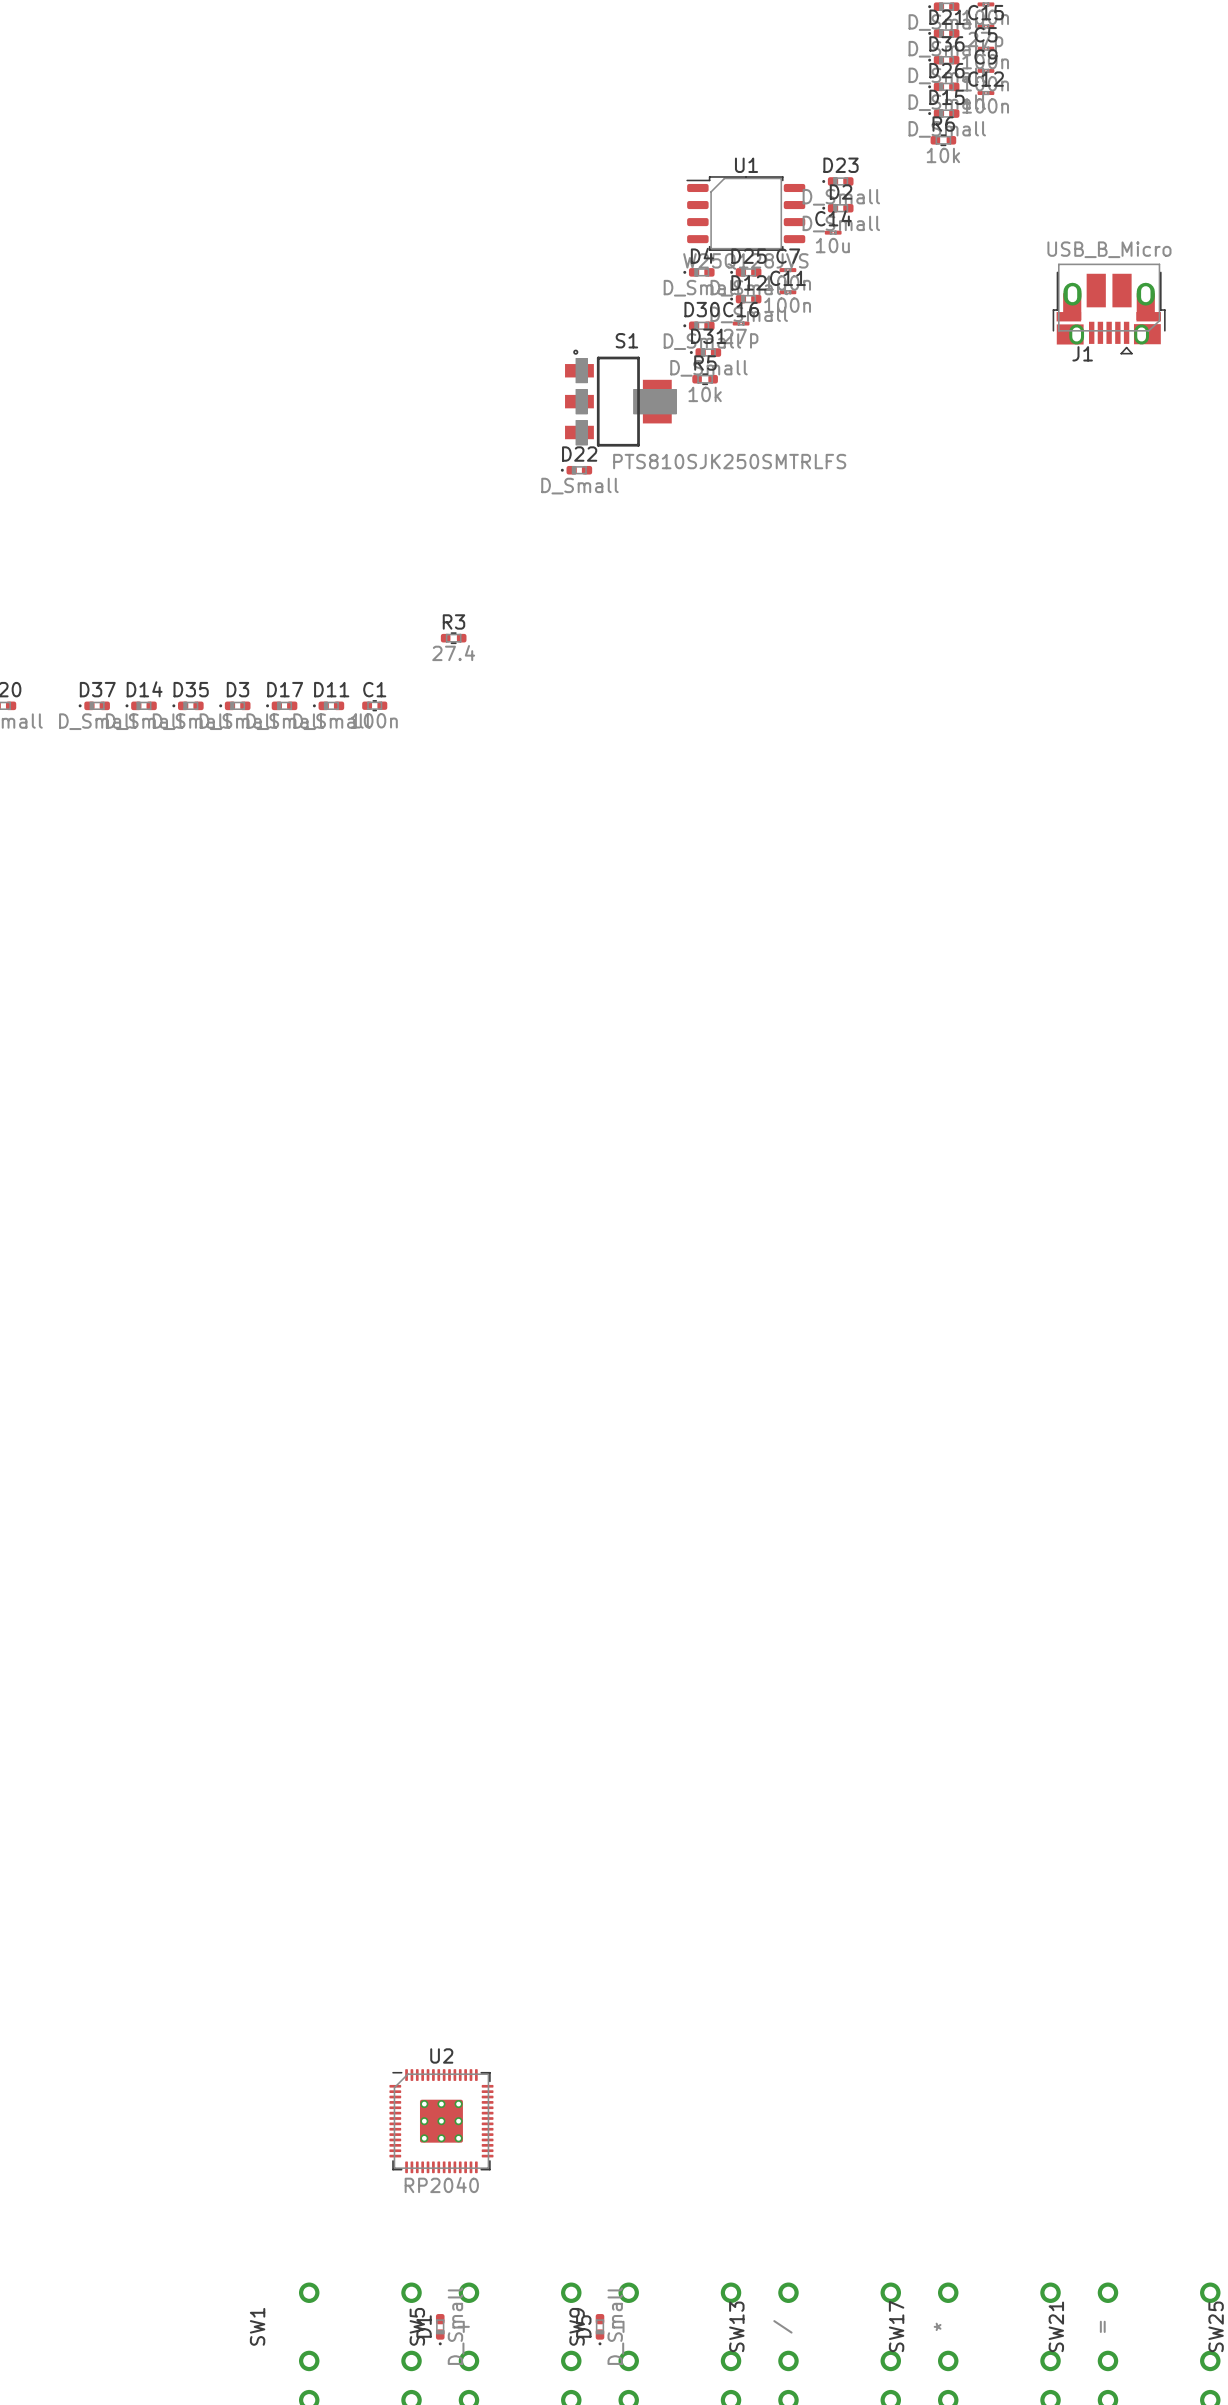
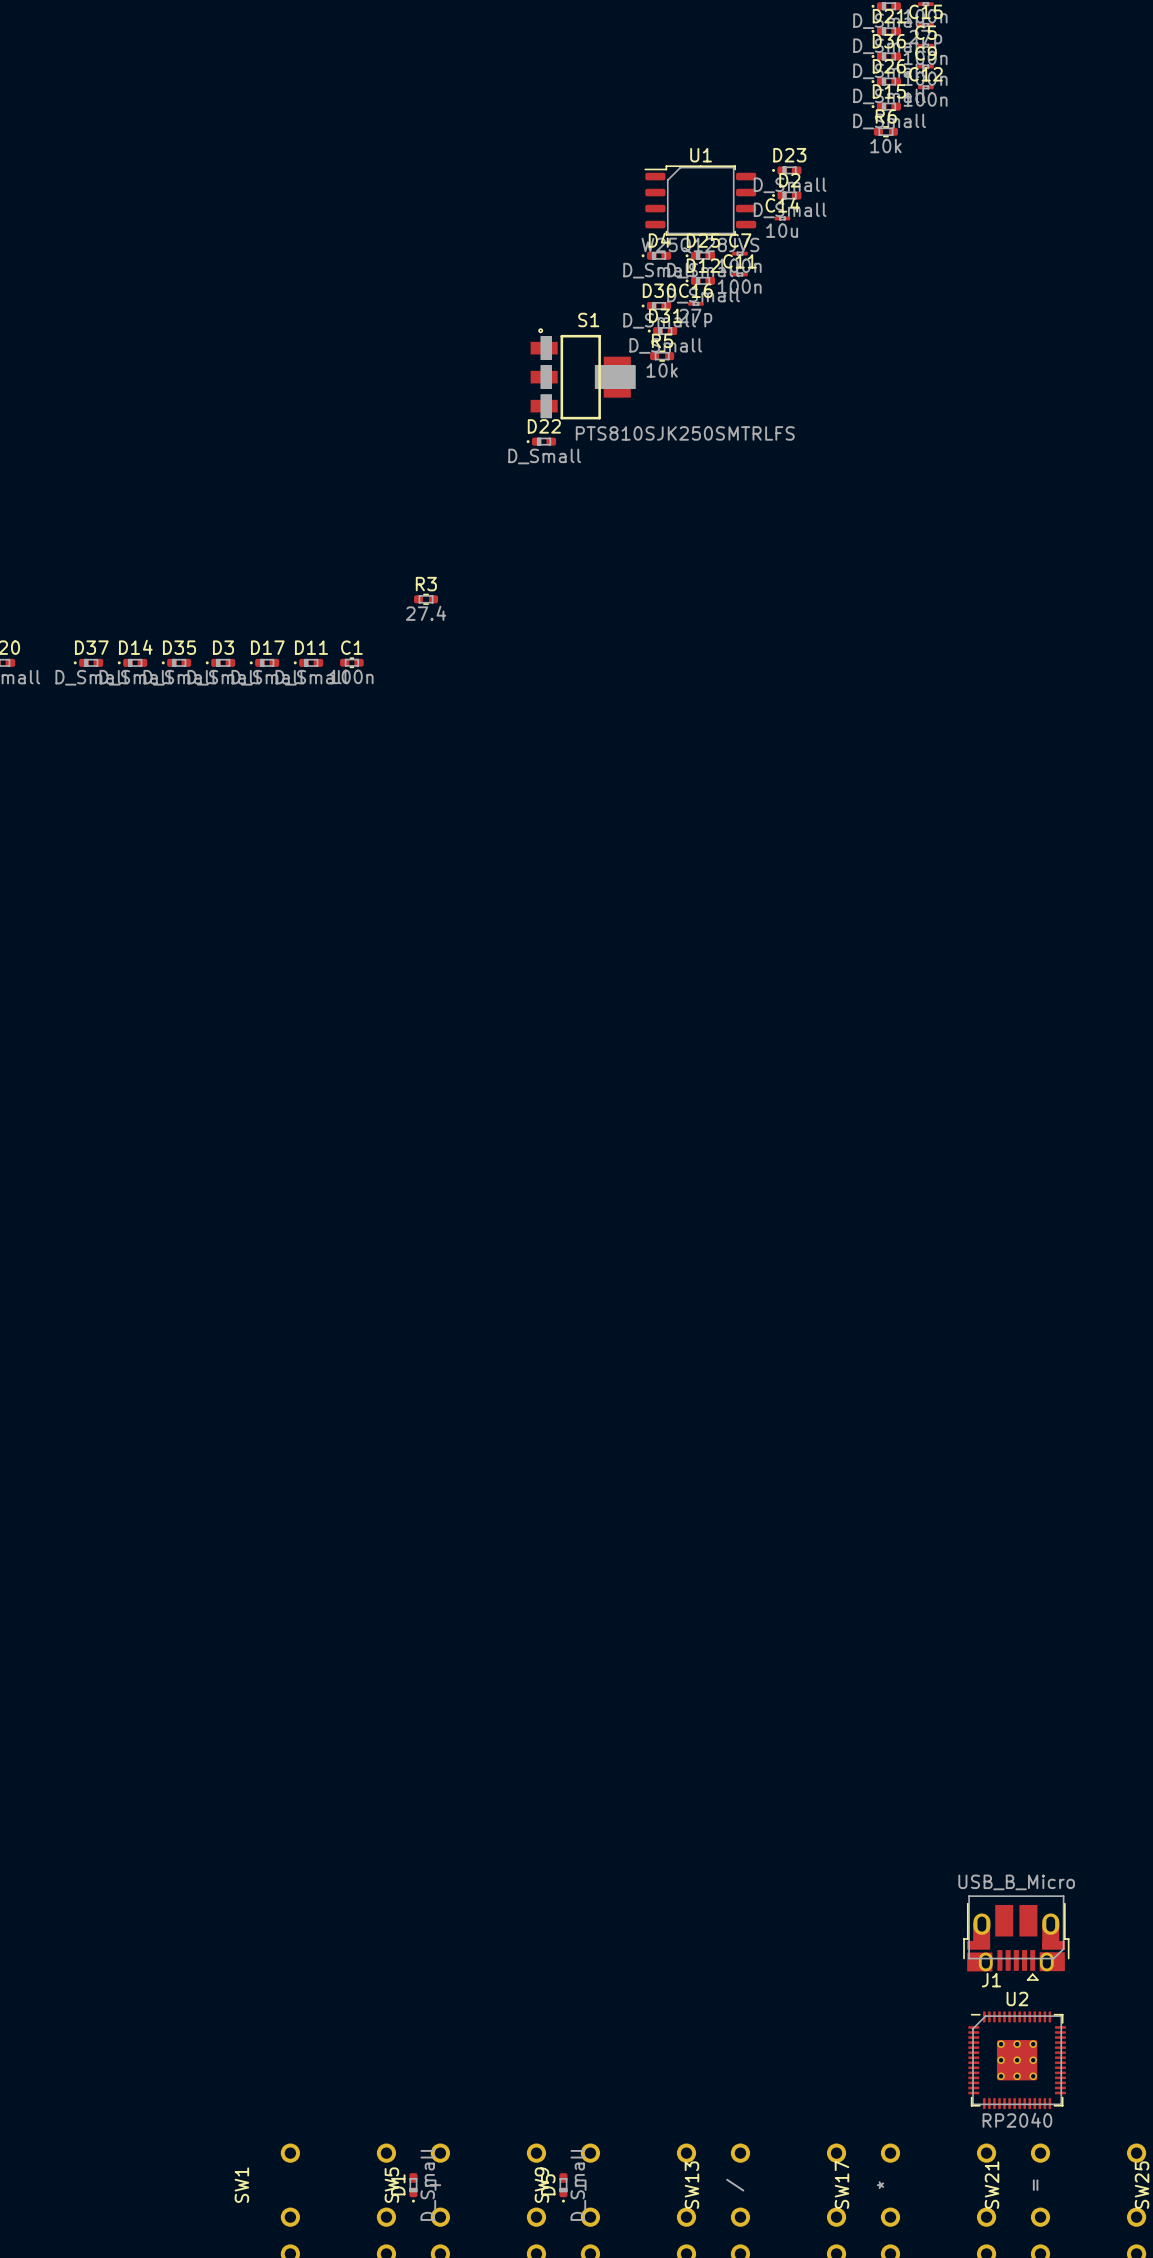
J1 position: (1109, 309) -> (1016, 1938)
U2 position: (441, 2121) -> (1017, 2060)

